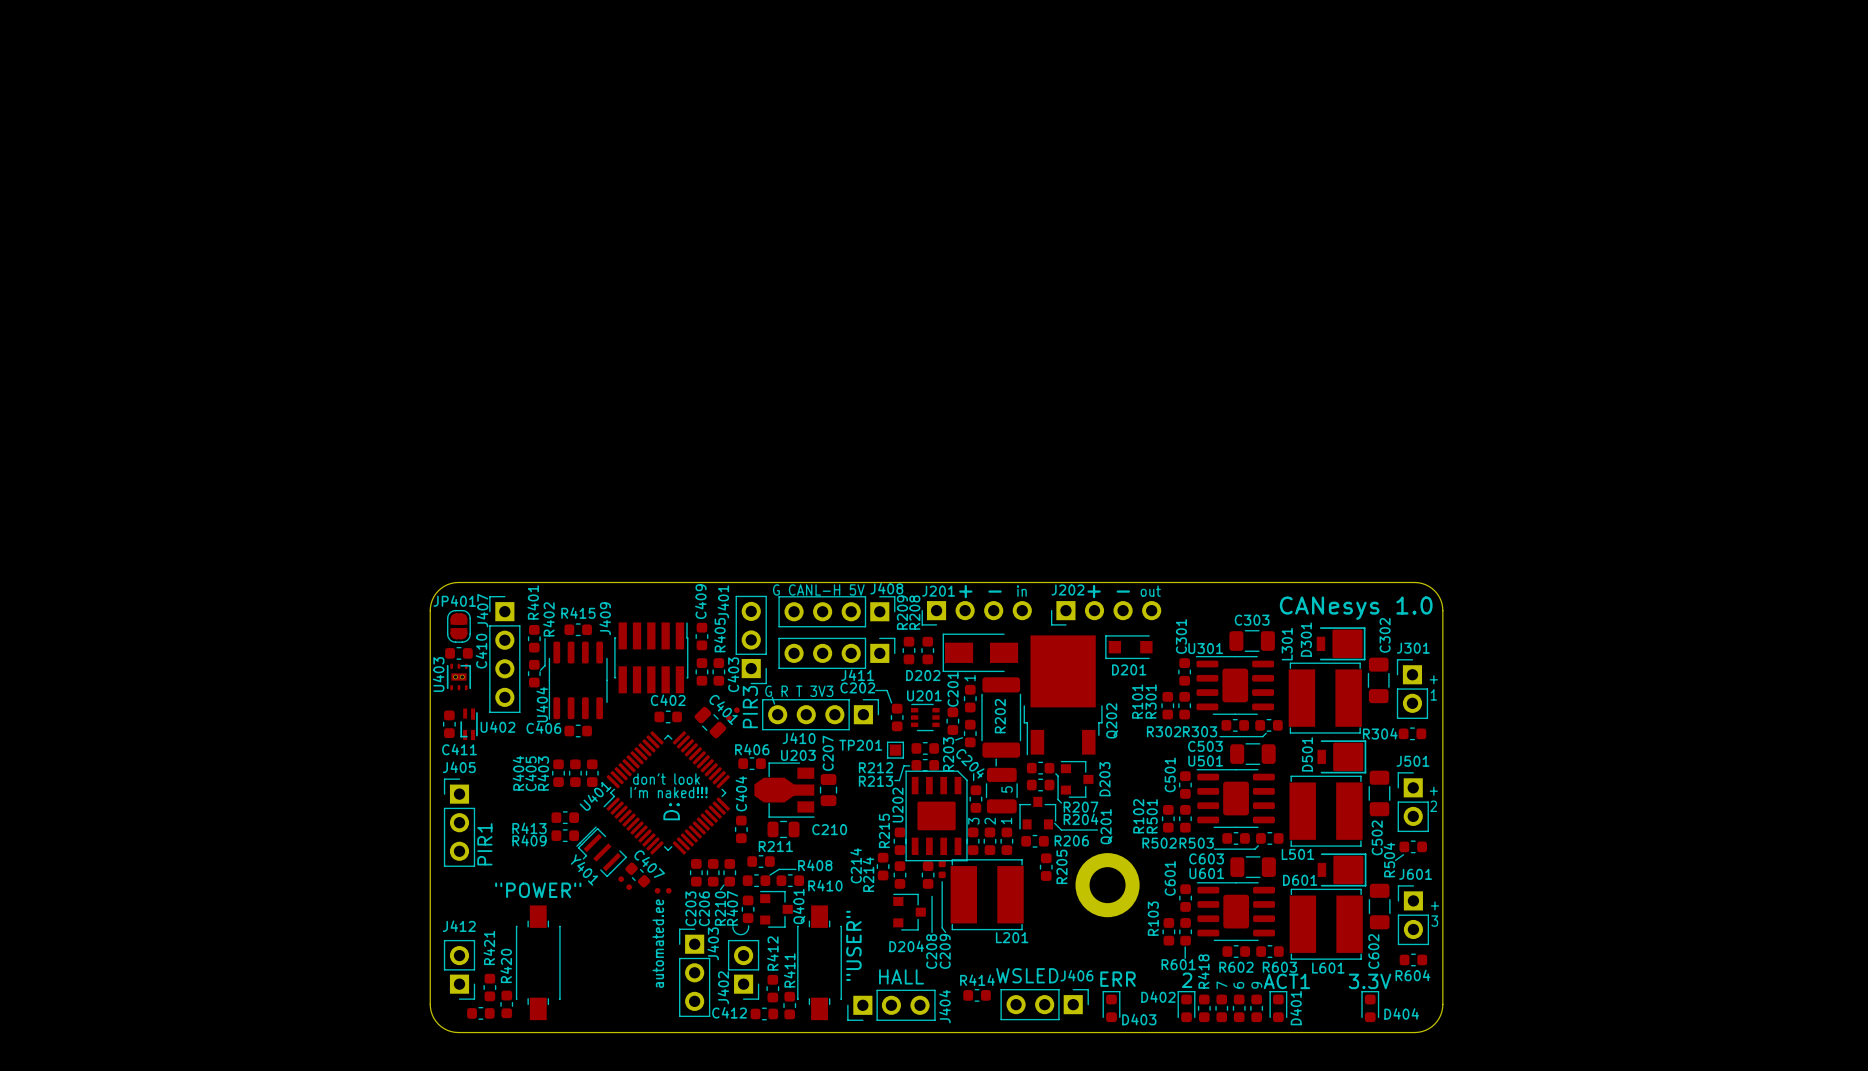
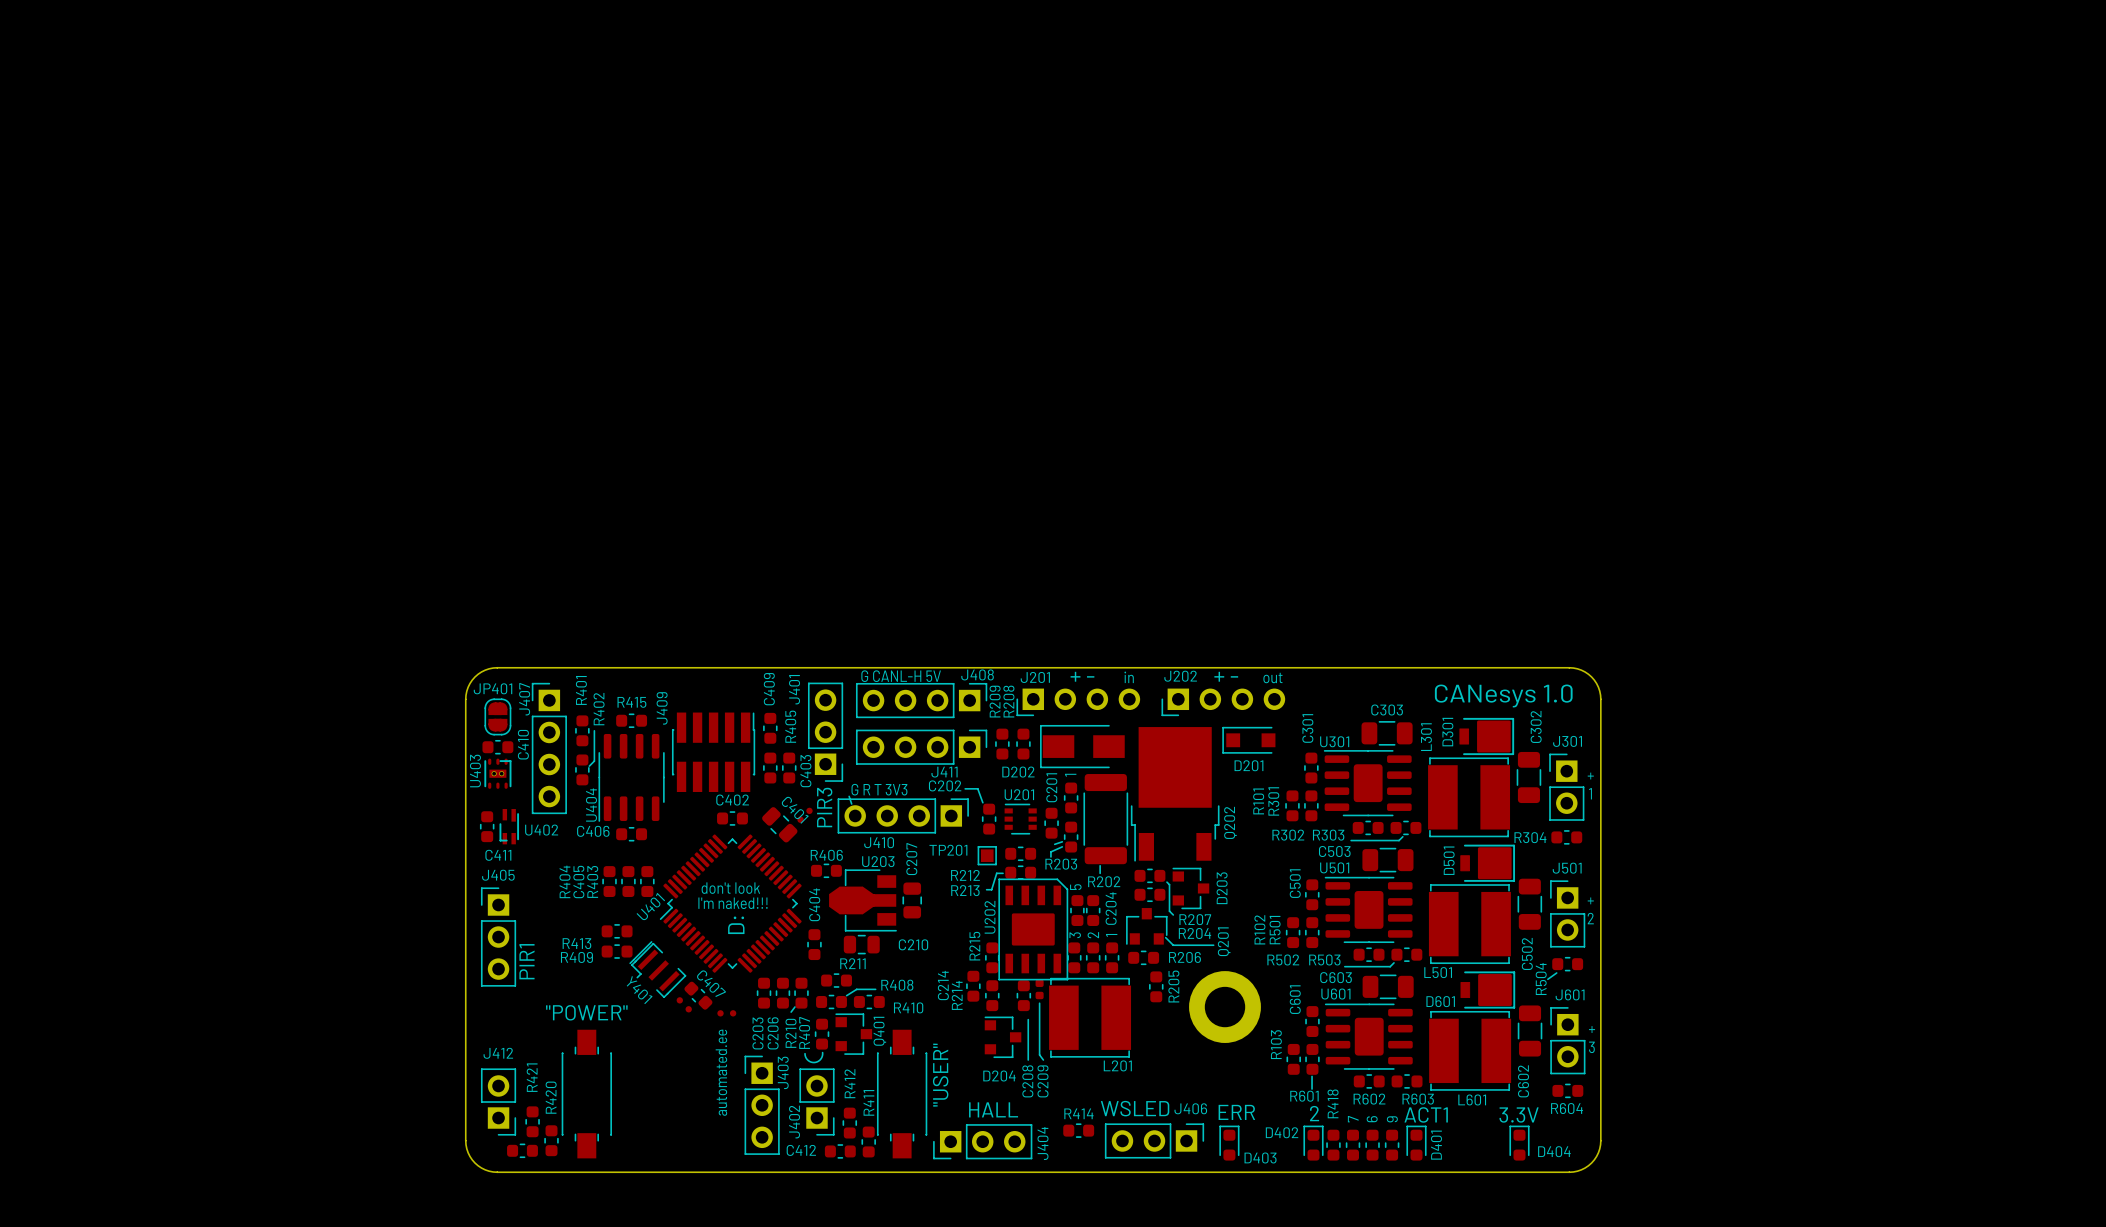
R202 name rotation: 0° (1000, 716) -> 90° clockwise (1104, 881)
R202 name position: R202 (1000, 716) -> R202 (1104, 881)
line: none -> (1062, 846) (1050, 851) (1050, 856)
R203 name rotation: 0° (948, 754) -> 90° clockwise (1061, 864)
C204 name: C204 (970, 763) -> none
line: (973, 773) (973, 780) -> none
text position: 5 (1007, 789) -> 5 (1075, 887)
part: (1001, 790) -> none
C204: none -> (1093, 910)

